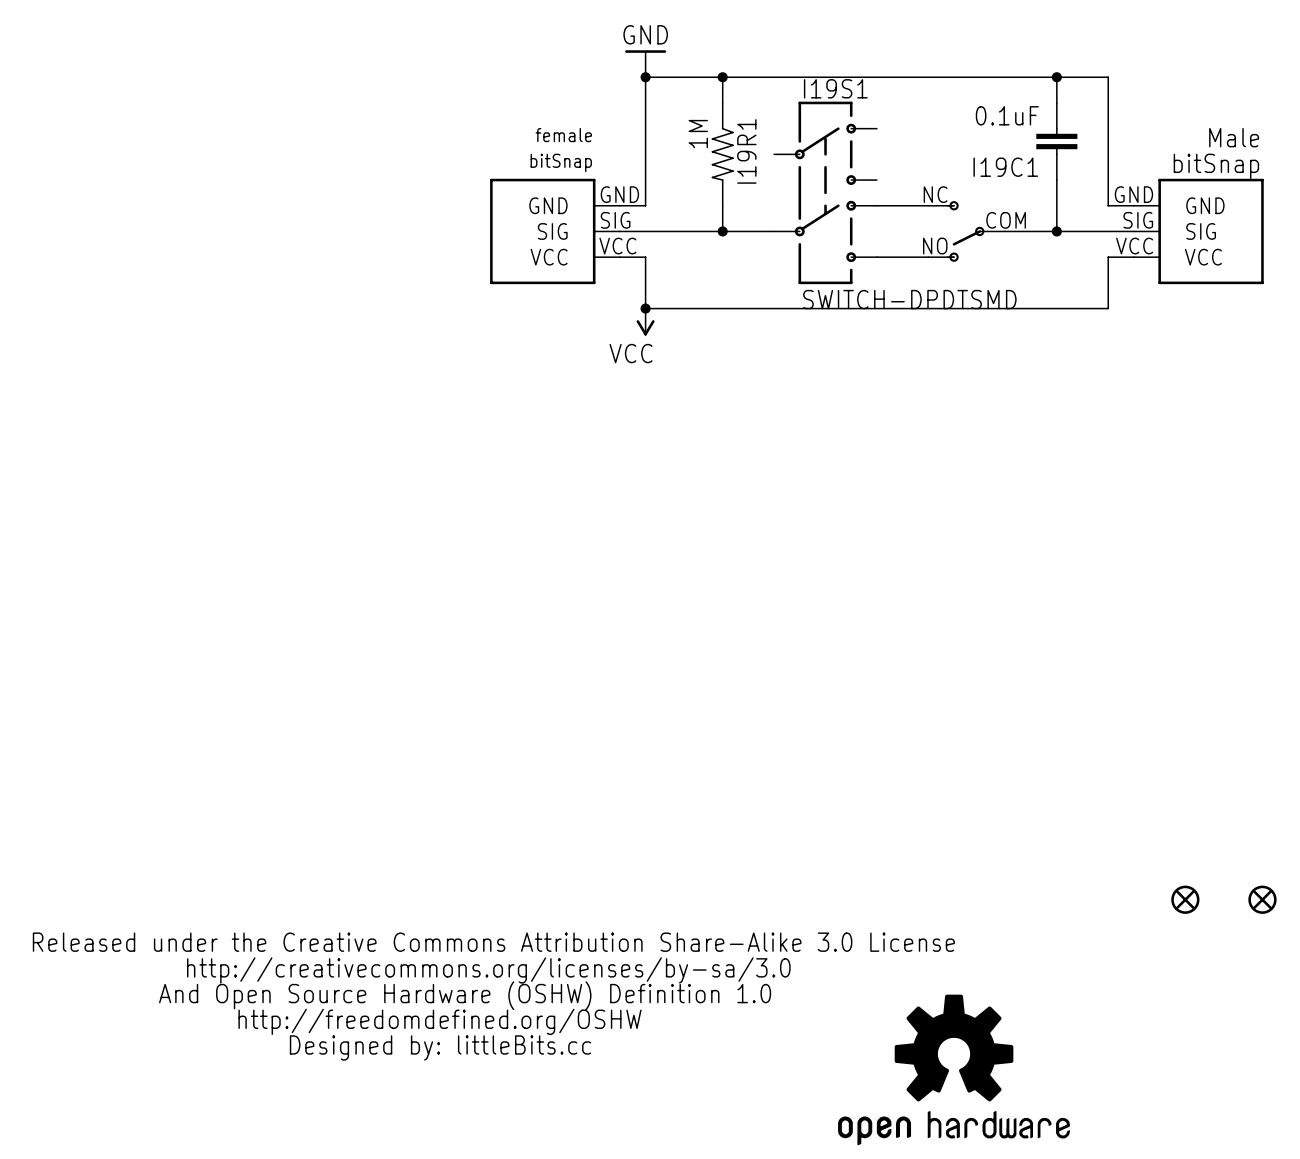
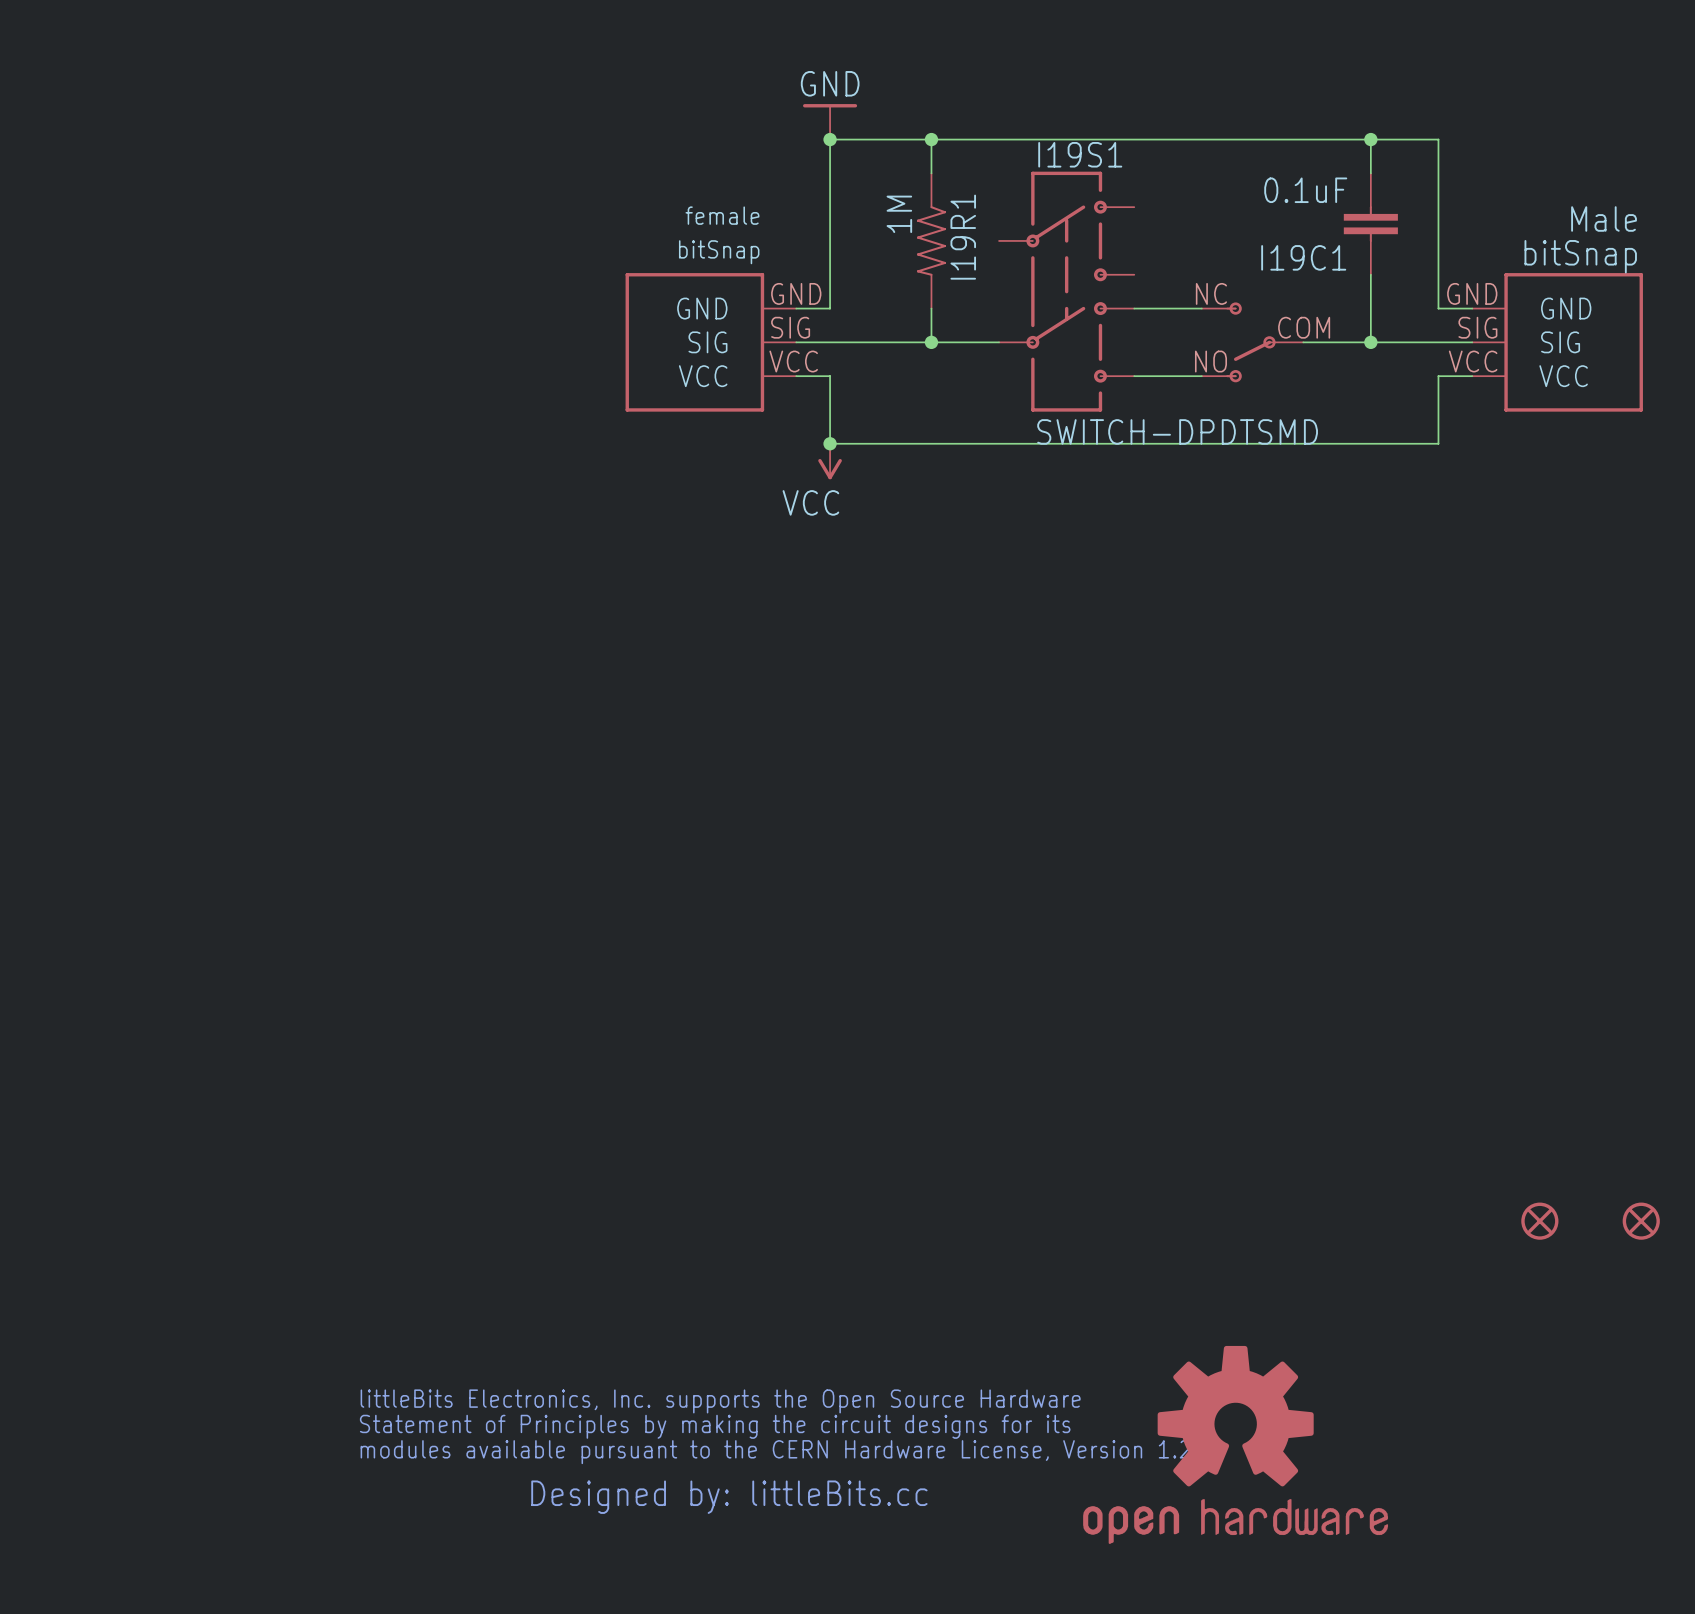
part: (493, 996) -> none
part: none -> (775, 1451)

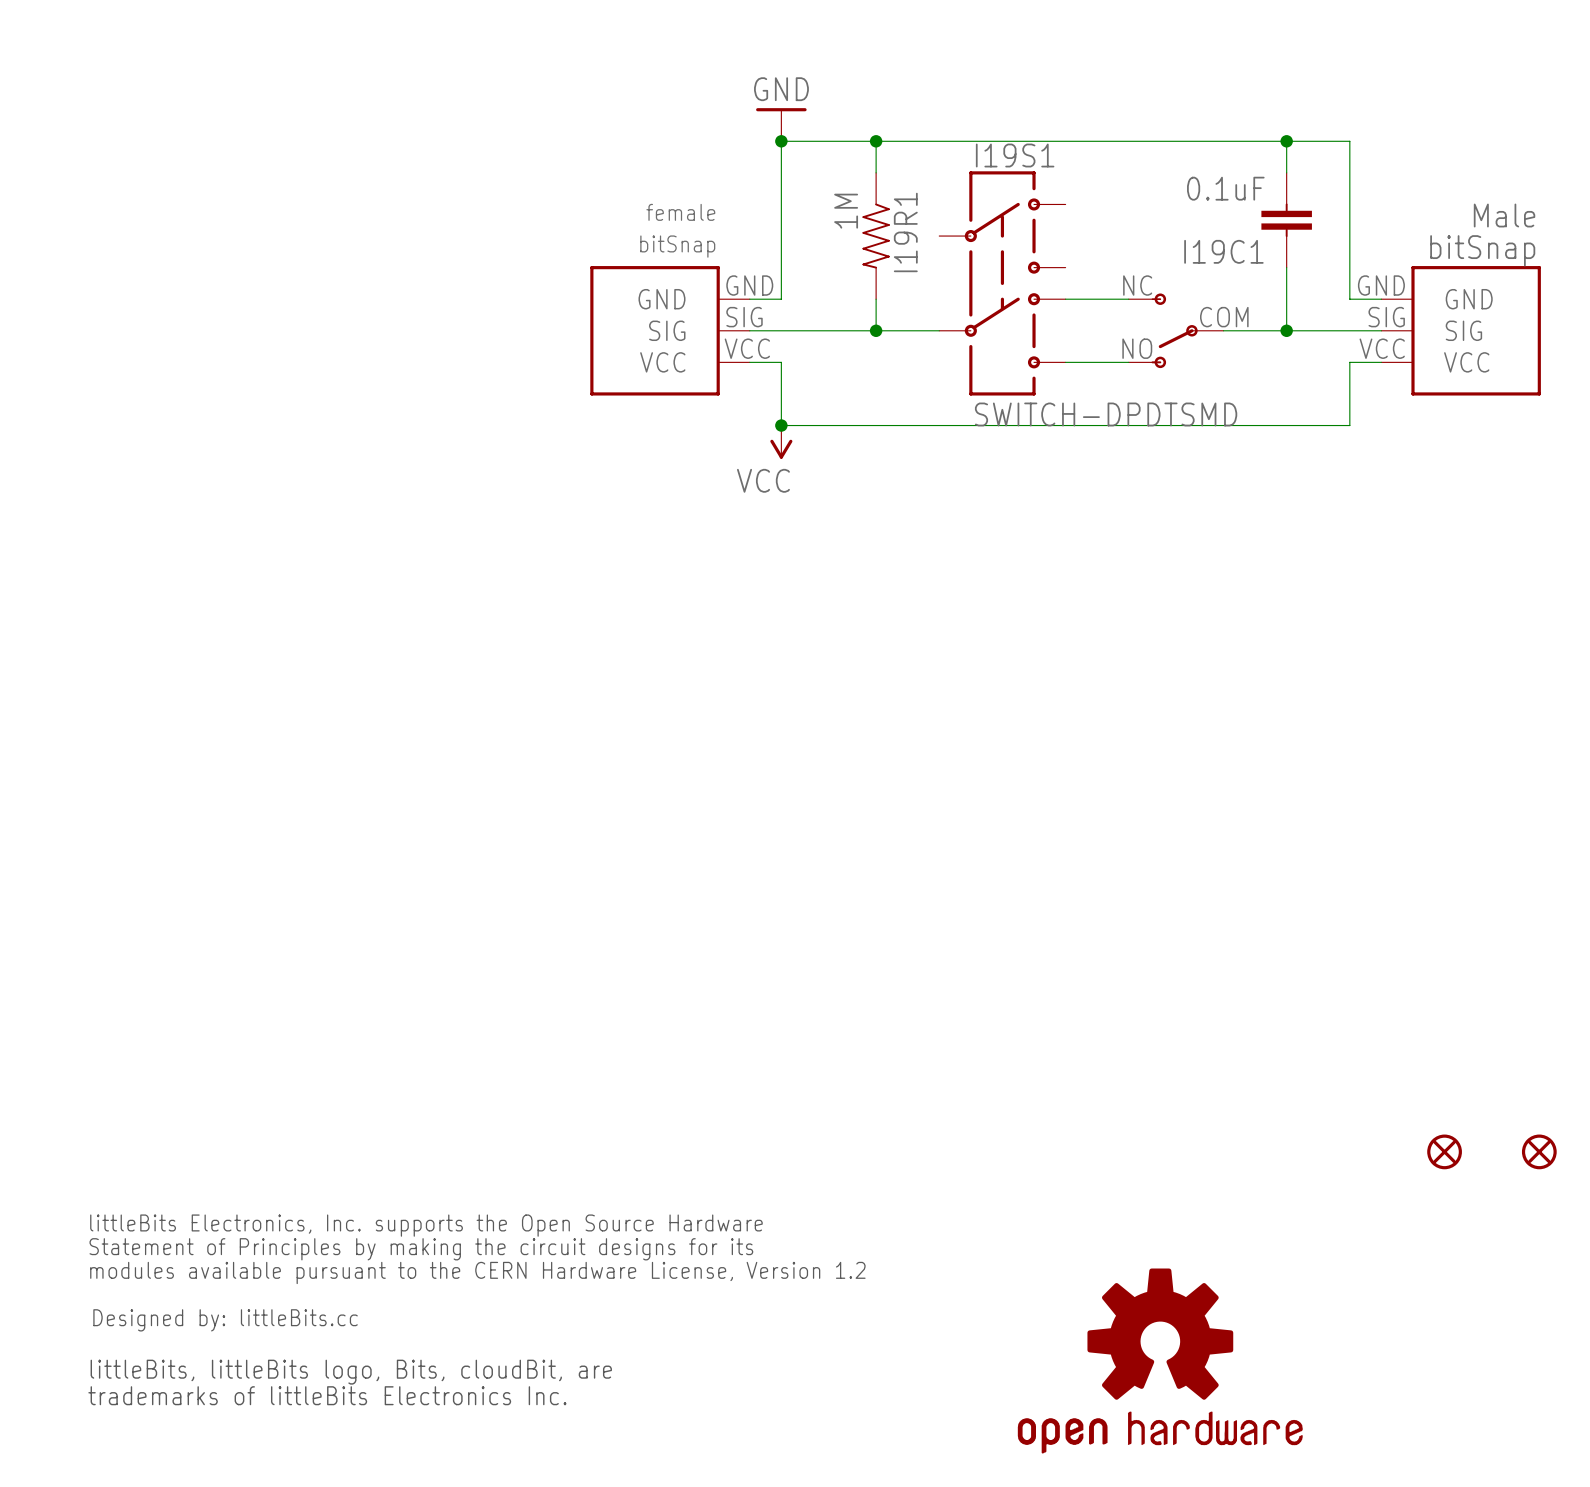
part: none -> (476, 1309)
part: (775, 1451) -> none

